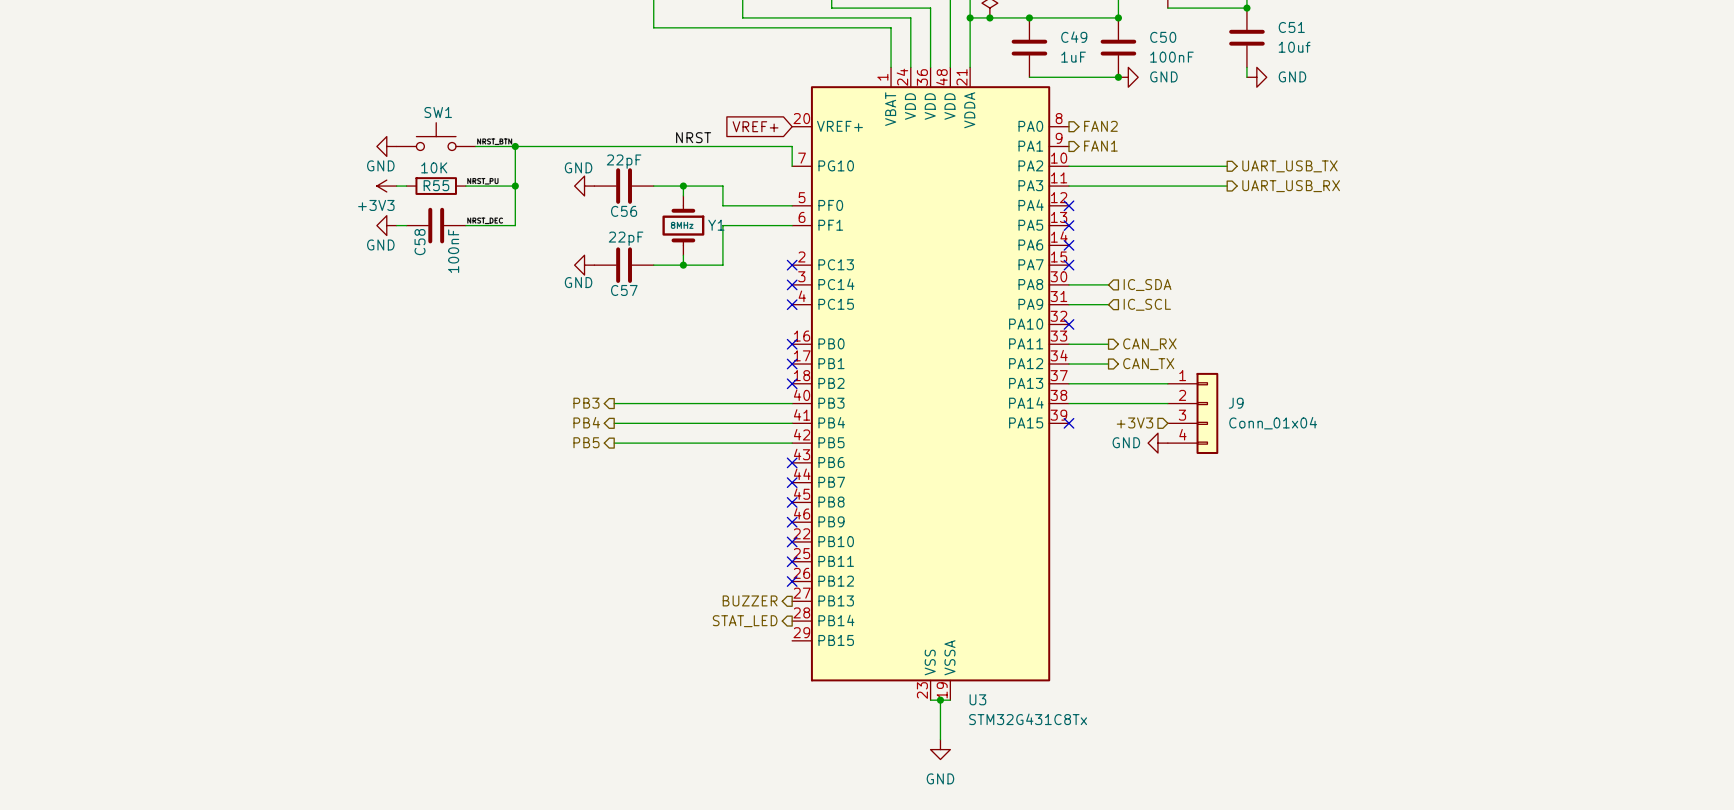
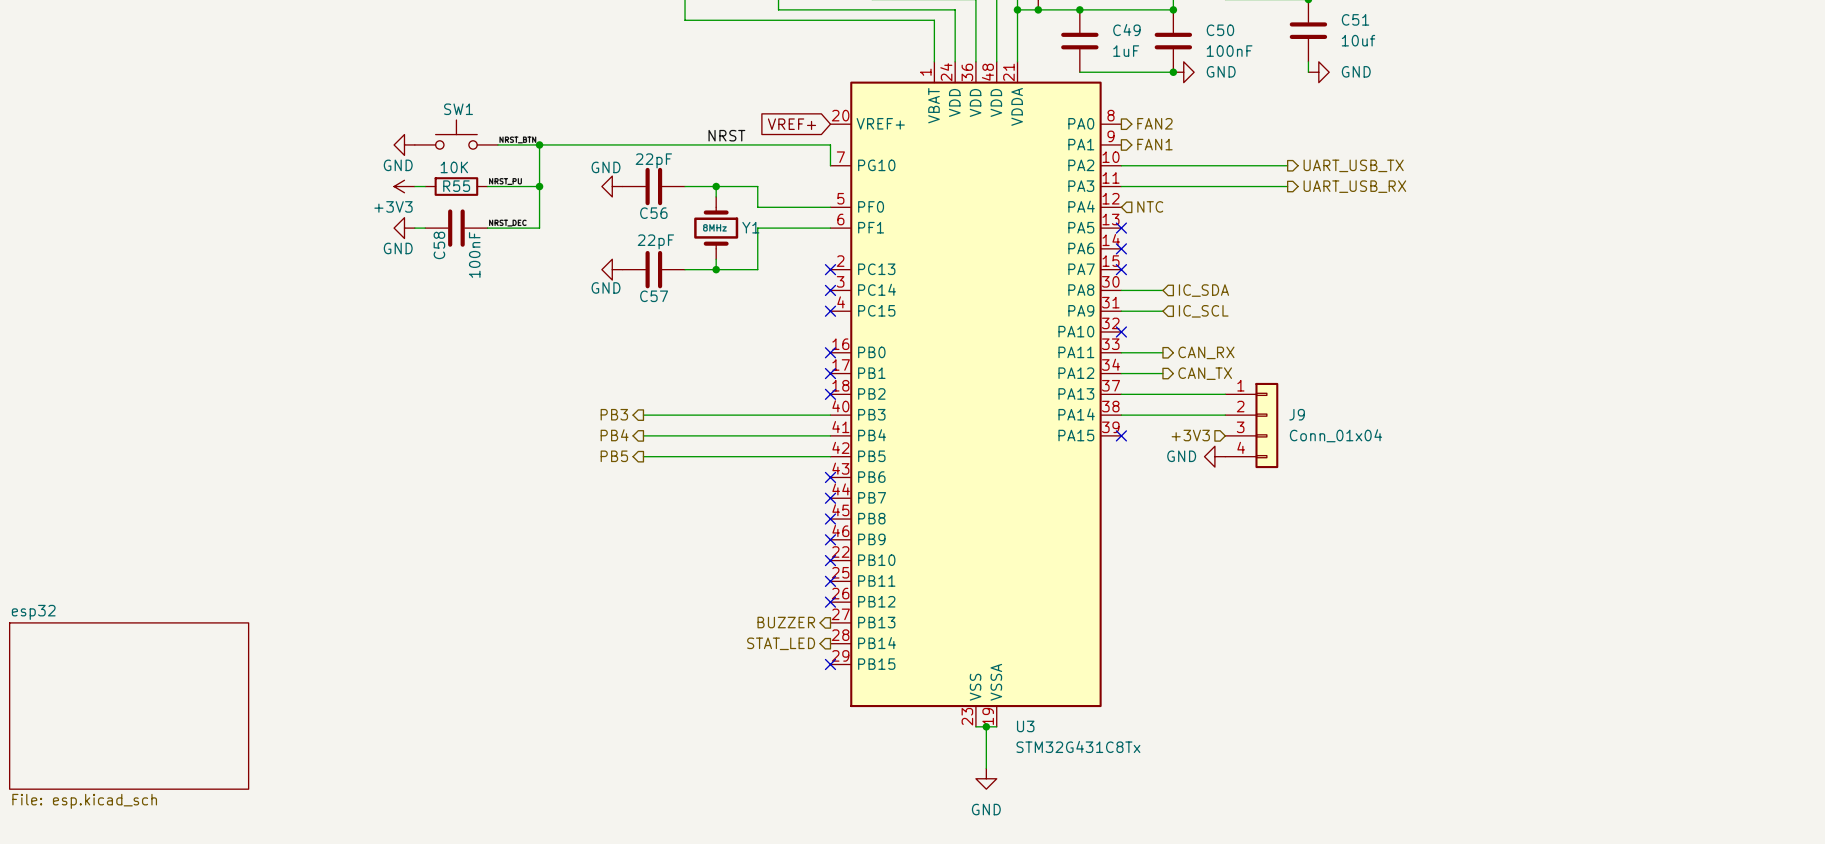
no-connect mark: (1068, 205) -> none
hierarchical label: none -> NTC (1150, 206)
no-connect mark: none -> (830, 664)
sheet esp32: none -> File: esp.kicad_sch (129, 706)

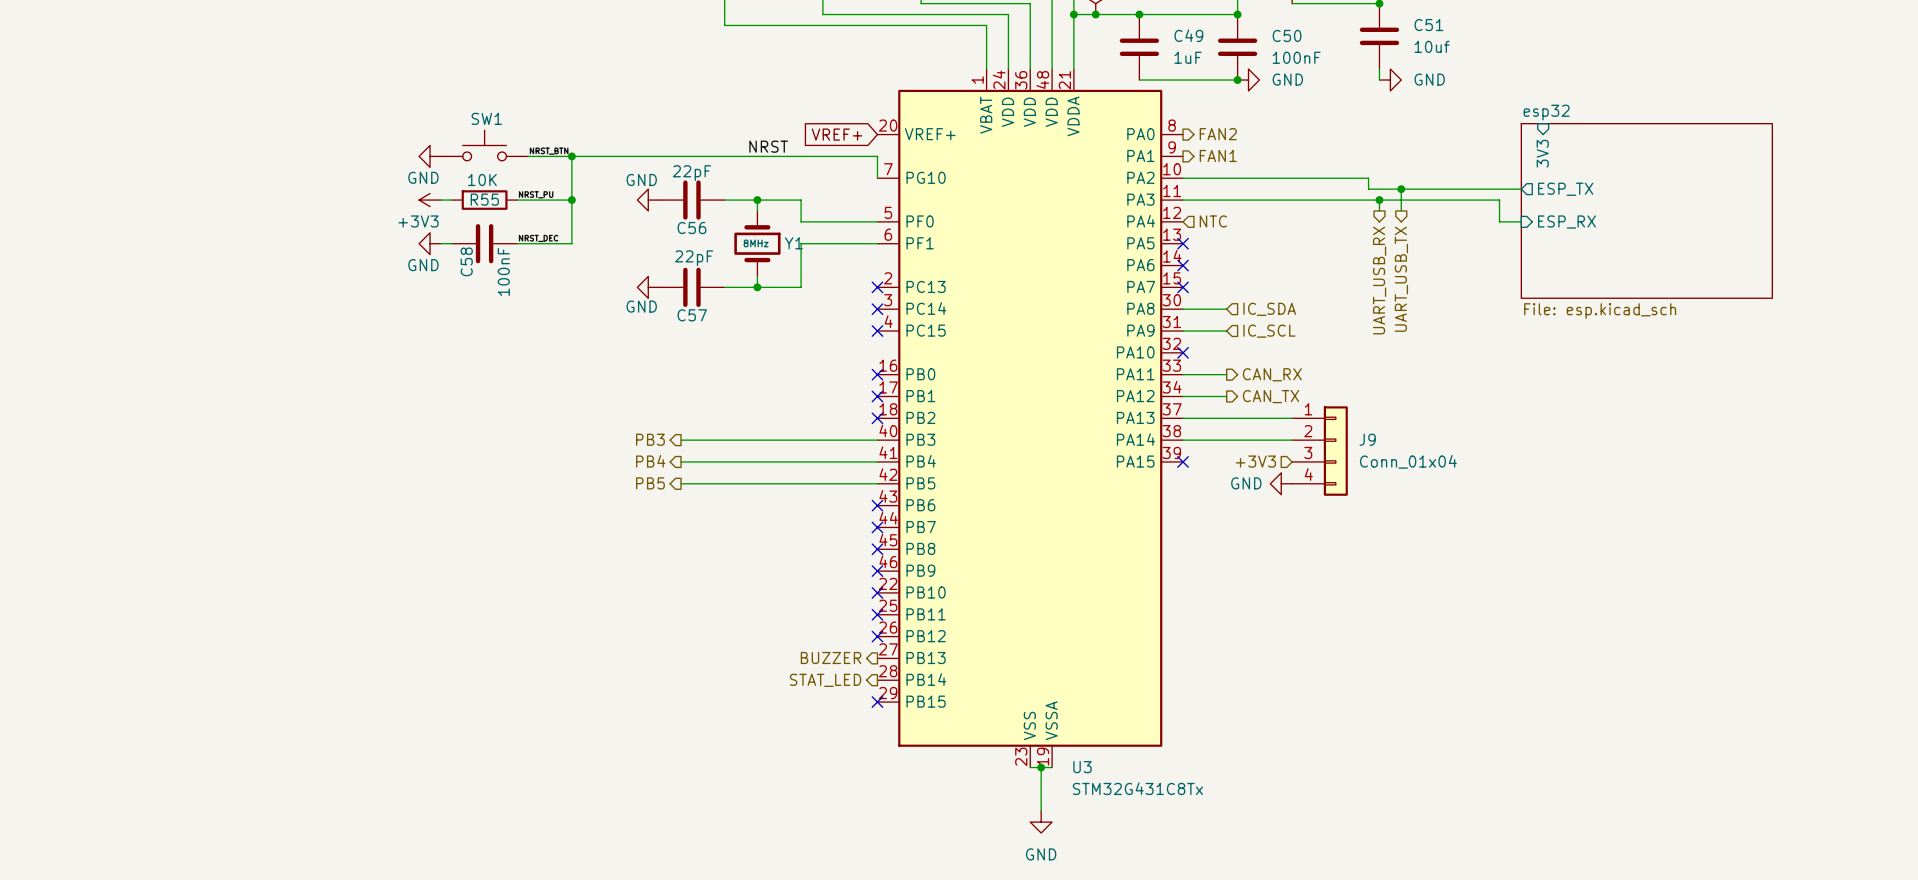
sheet pin: none -> 3V3 (1542, 153)
wire: none -> (1357, 178) (1368, 178) (1368, 189) (1521, 189)
hierarchical label rotation: 0° (1353, 165) -> 90° clockwise (1401, 279)
wire: none -> (1401, 189) (1401, 210)
junction: none -> (1401, 189)
sheet pin: none -> ESP_TX (1565, 189)
wire: none -> (1357, 200) (1499, 200) (1499, 221) (1521, 221)
wire: none -> (1379, 200) (1379, 210)
junction: none -> (1379, 200)
hierarchical label rotation: 0° (1354, 186) -> 90° clockwise (1379, 280)
sheet pin: none -> ESP_RX (1566, 221)
sheet esp32 position: (129, 706) -> (1646, 210)

